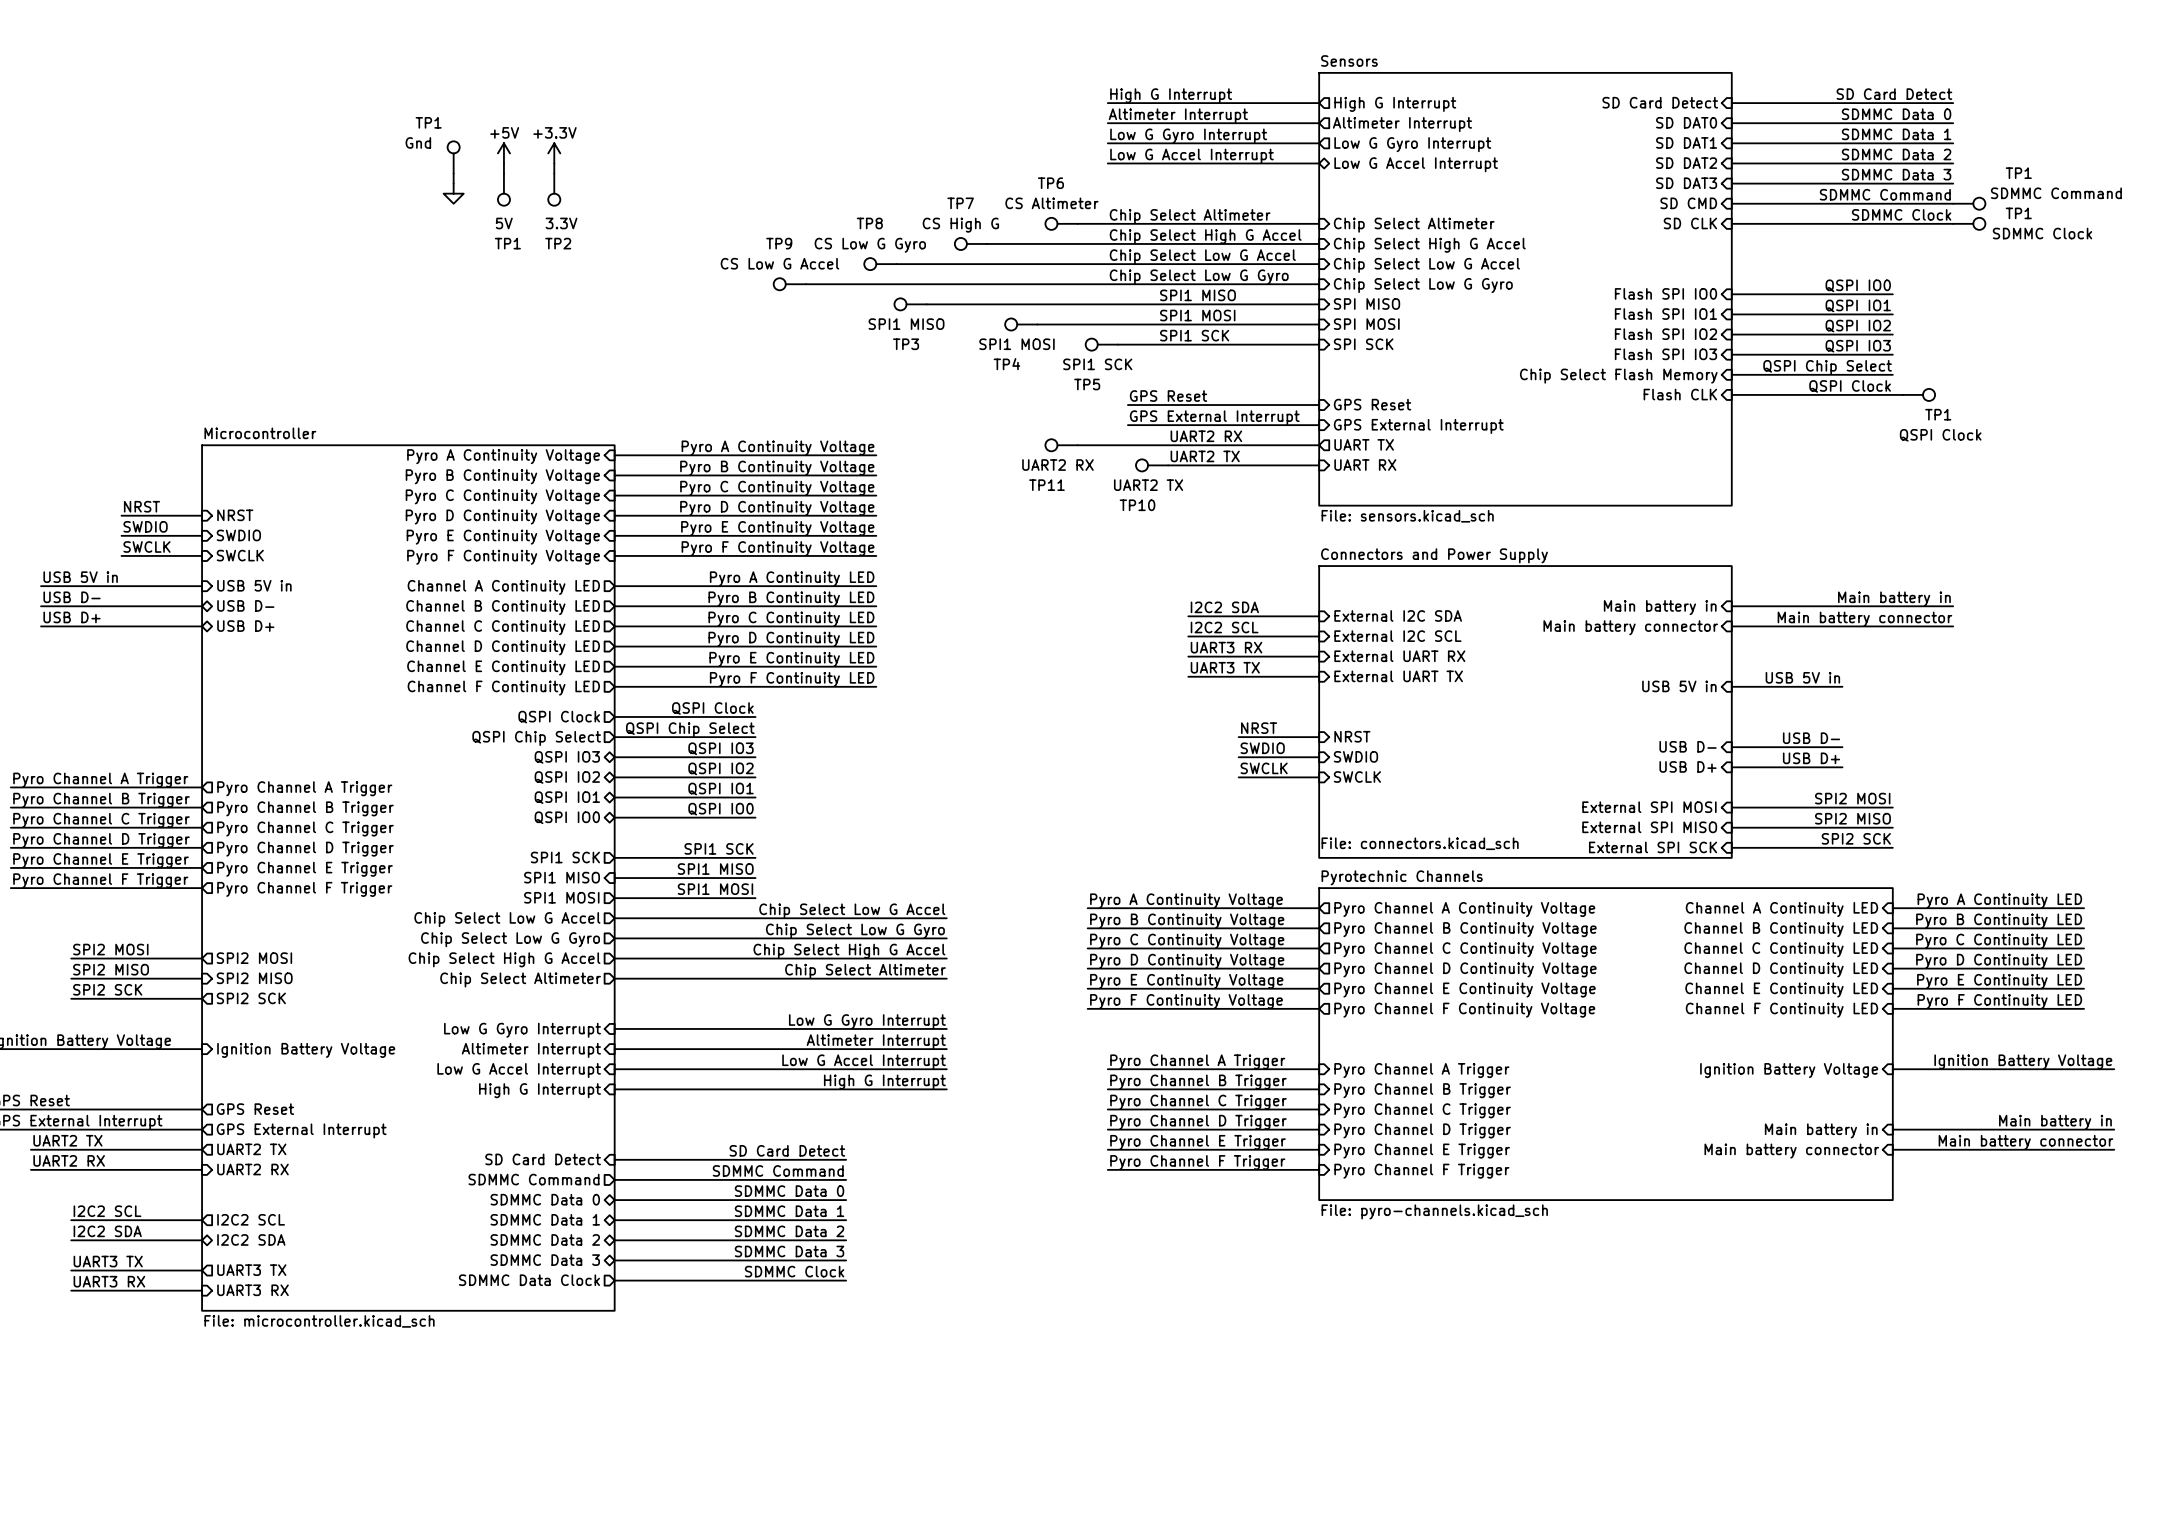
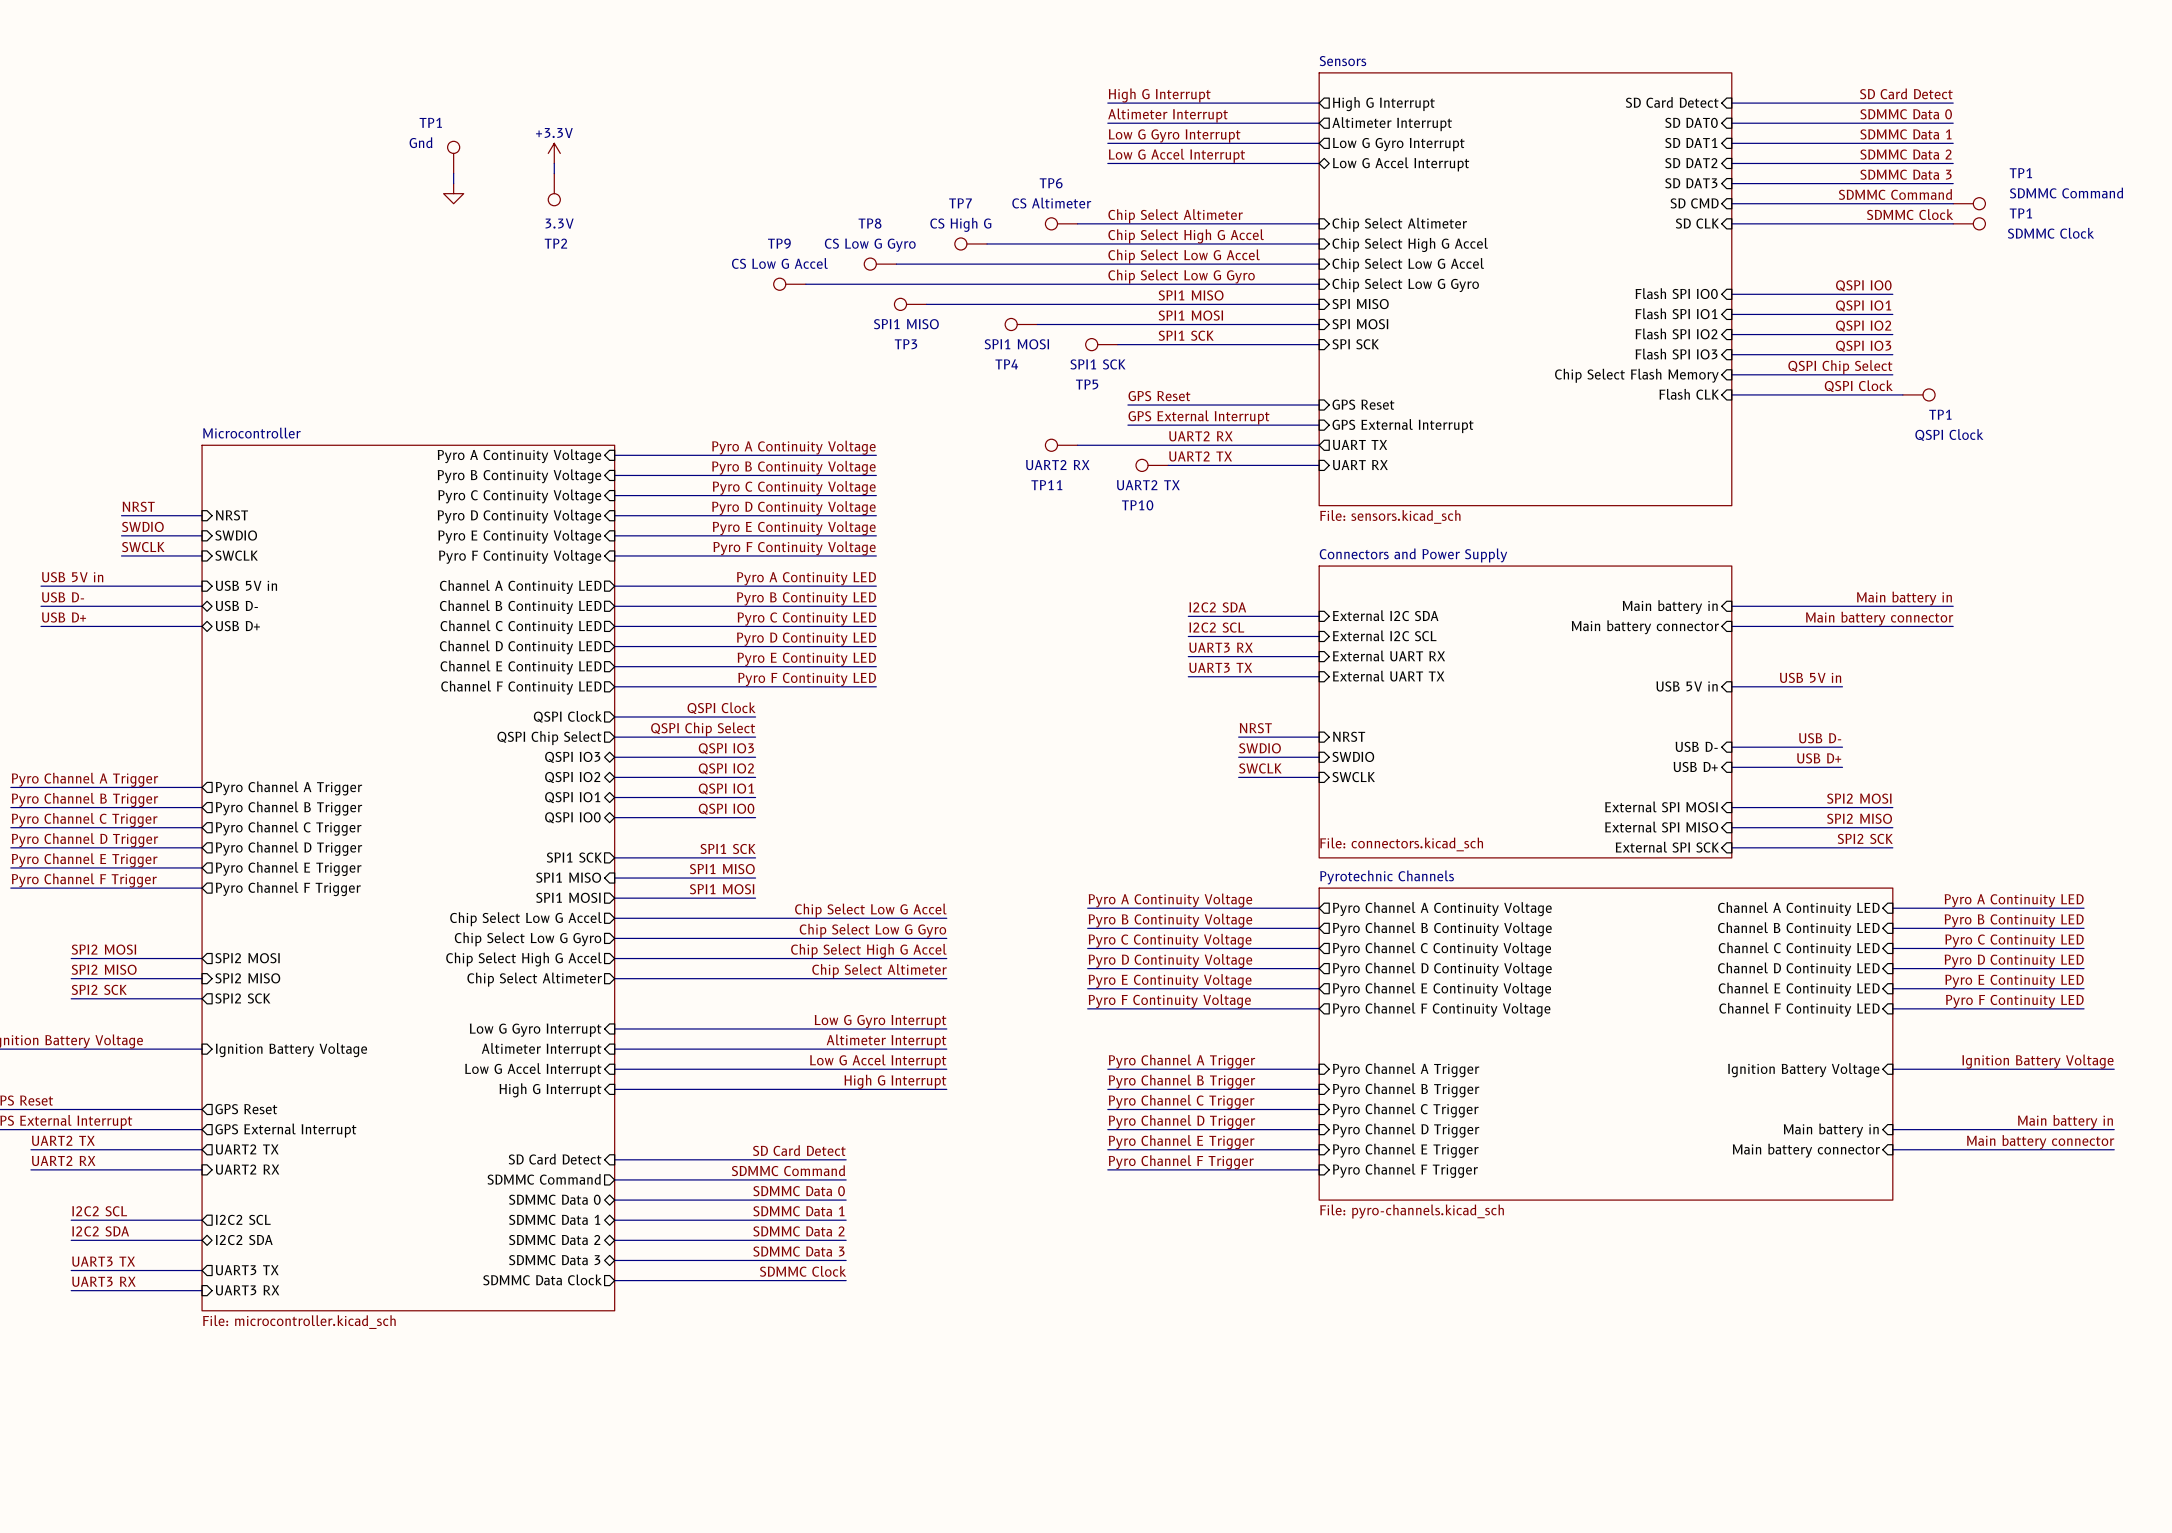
power symbol: +5V (503, 153) -> none
wire: (503, 163) (503, 173) -> none
TP1: 5V (503, 189) -> none

